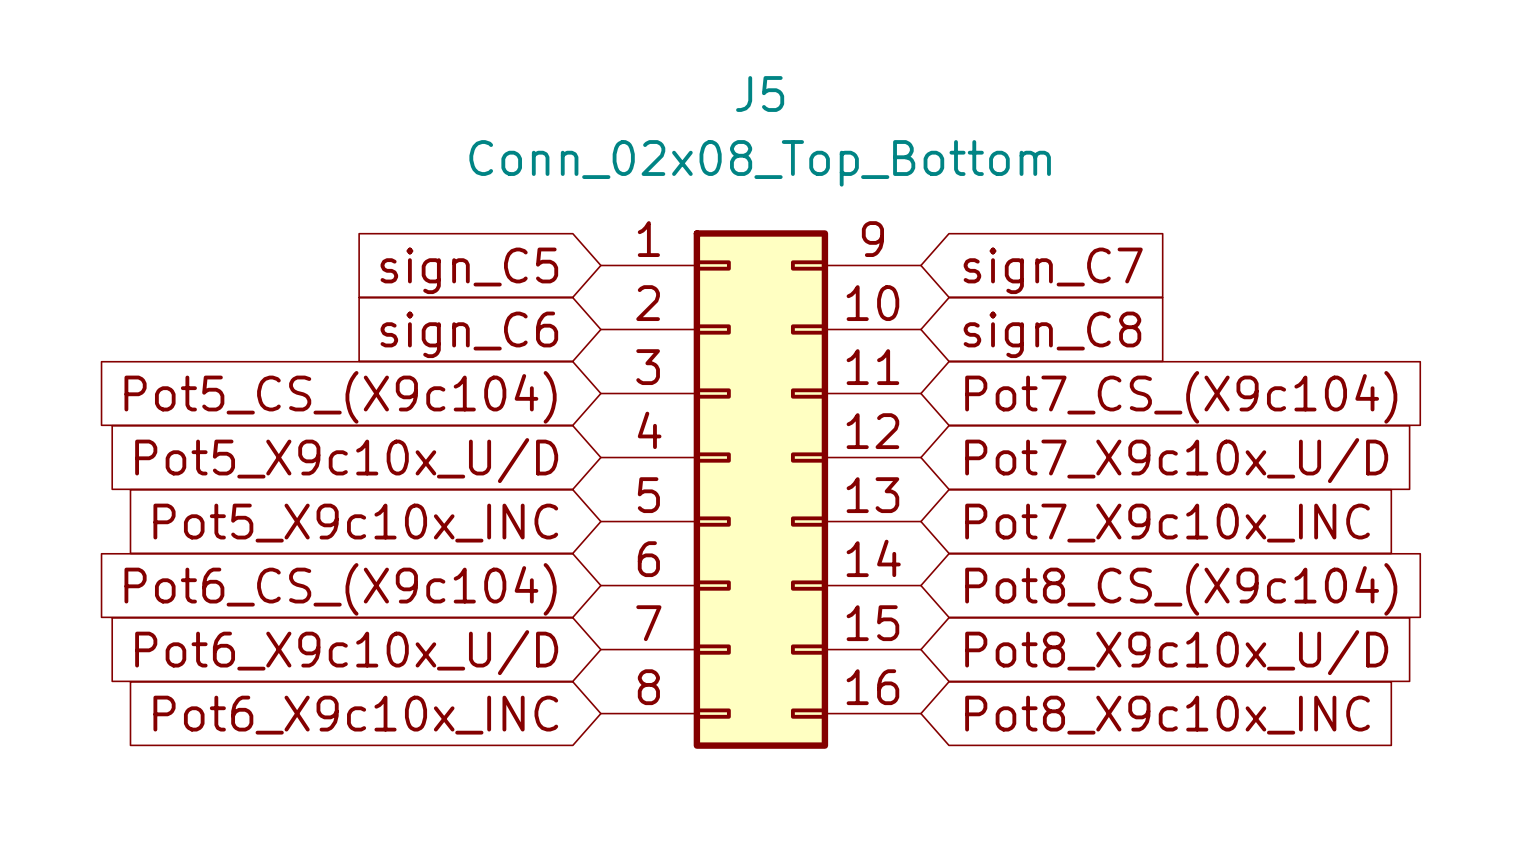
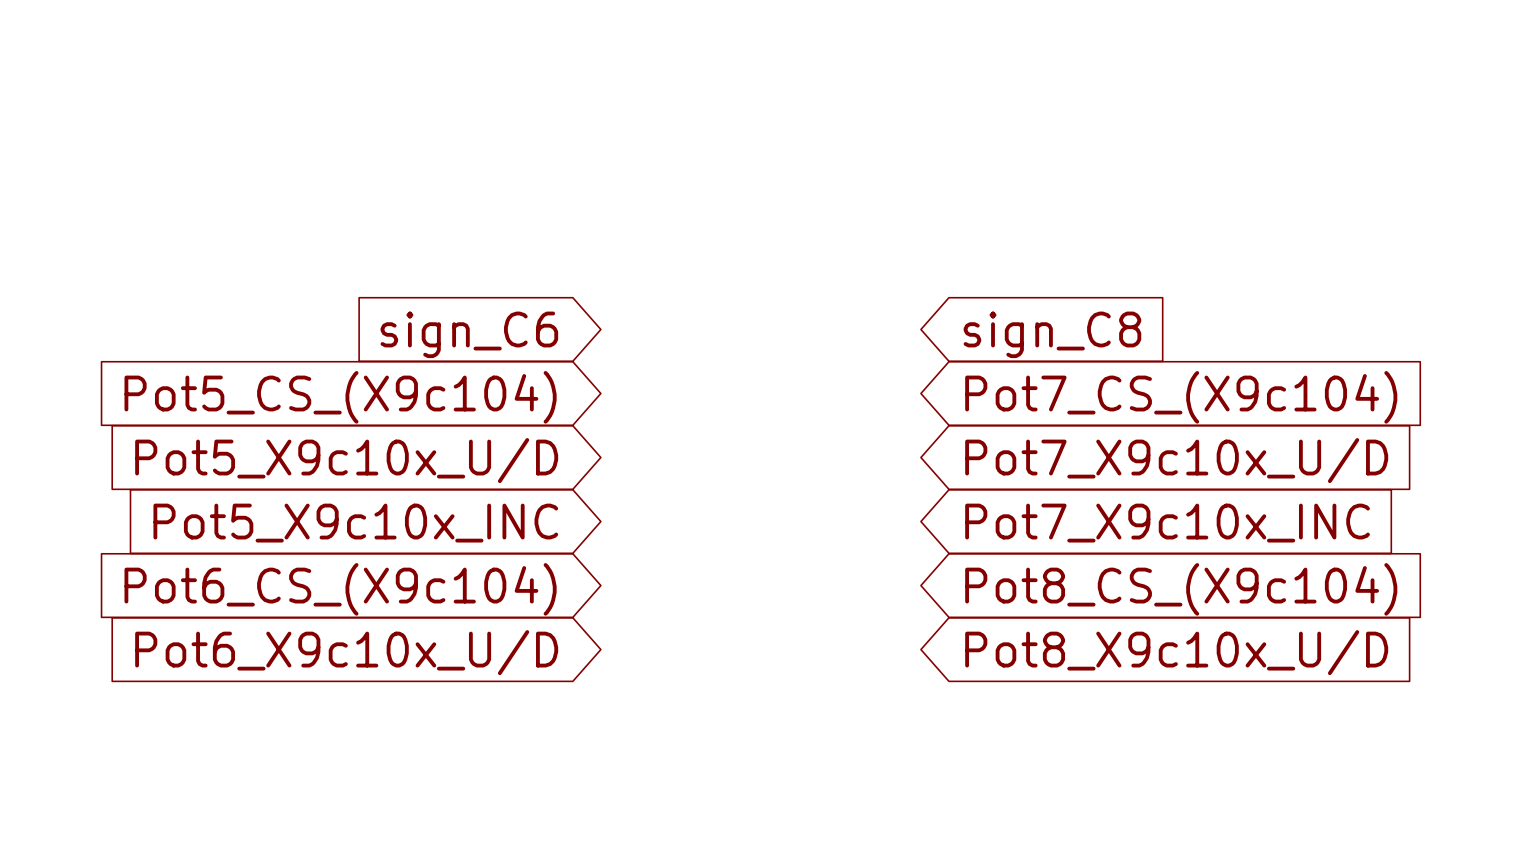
global label: sign_C5 (469, 270) -> none
global label: sign_C7 (1053, 270) -> none
J5: Conn_02x08_Top_Bottom (760, 489) -> none
global label: Pot6_X9c10x_INC (355, 715) -> none
global label: Pot8_X9c10x_INC (1167, 715) -> none

